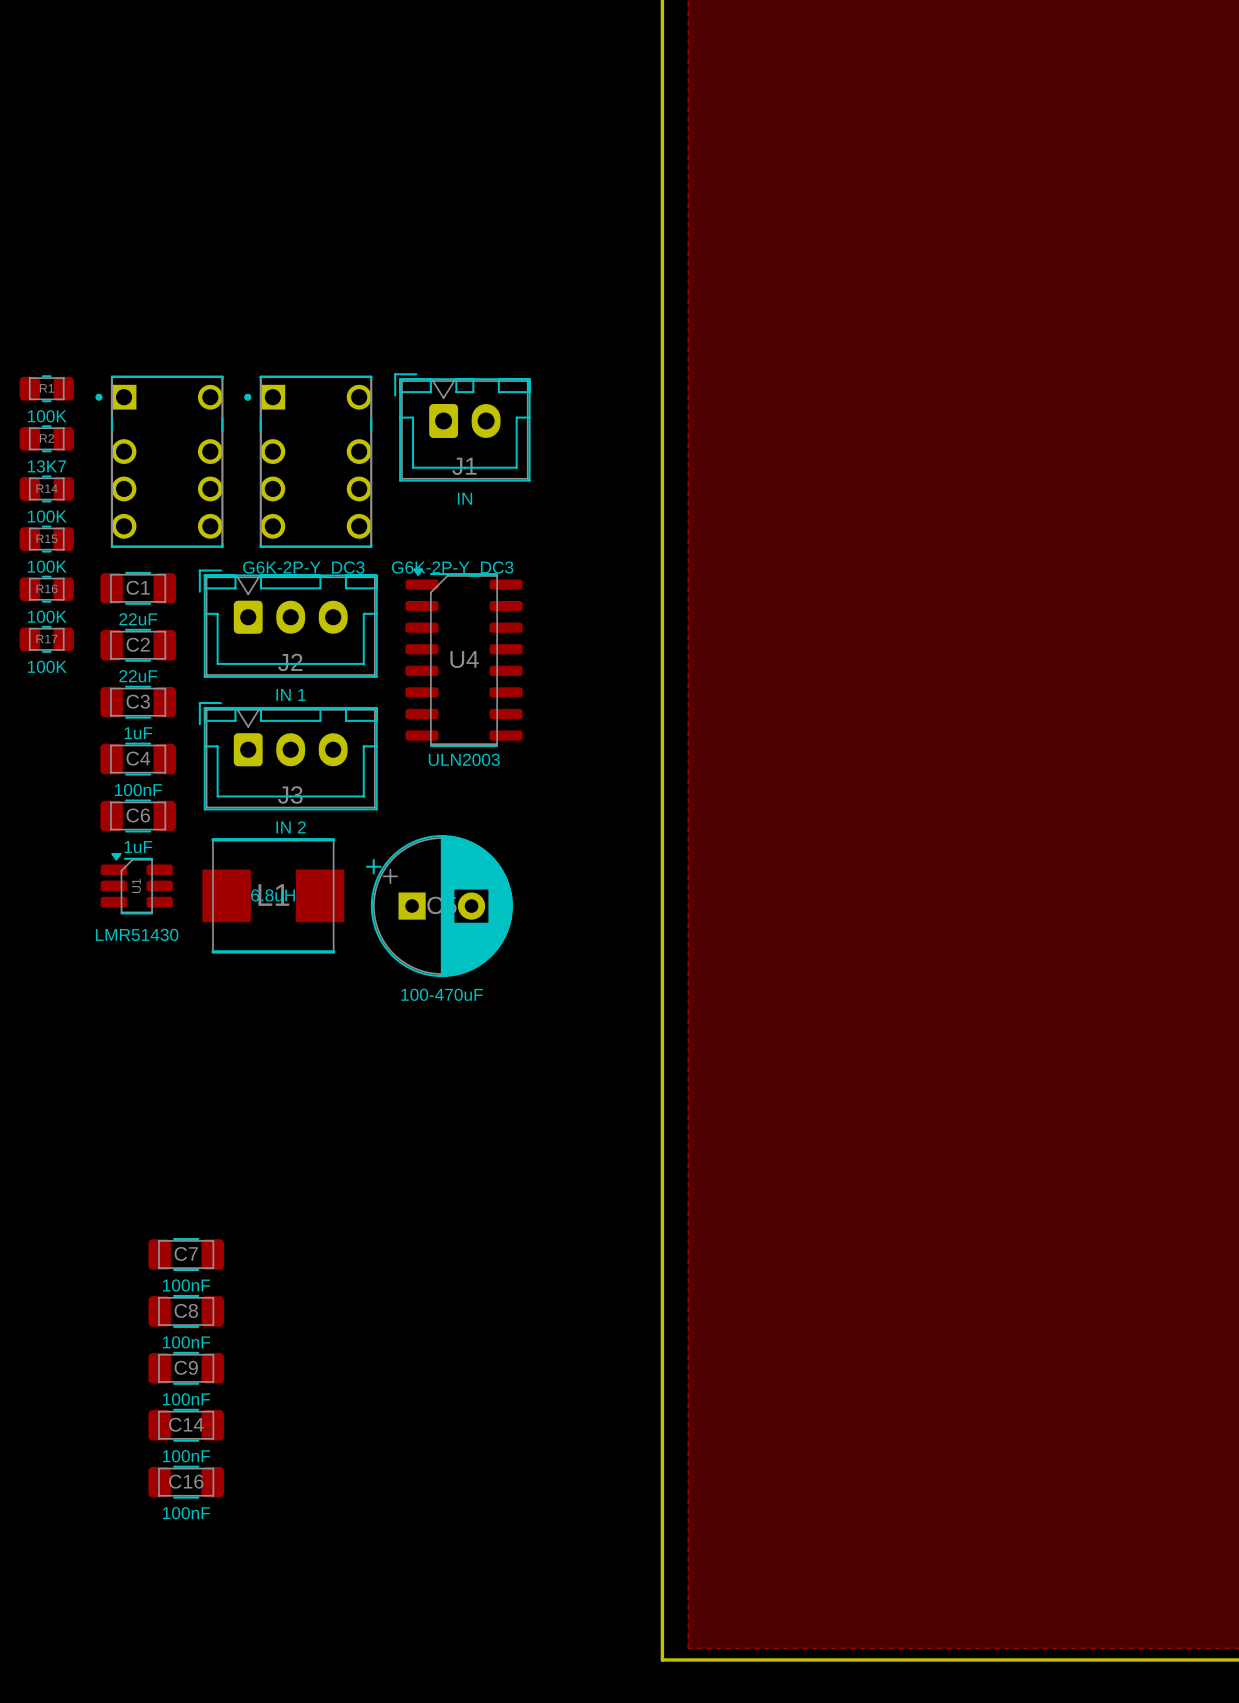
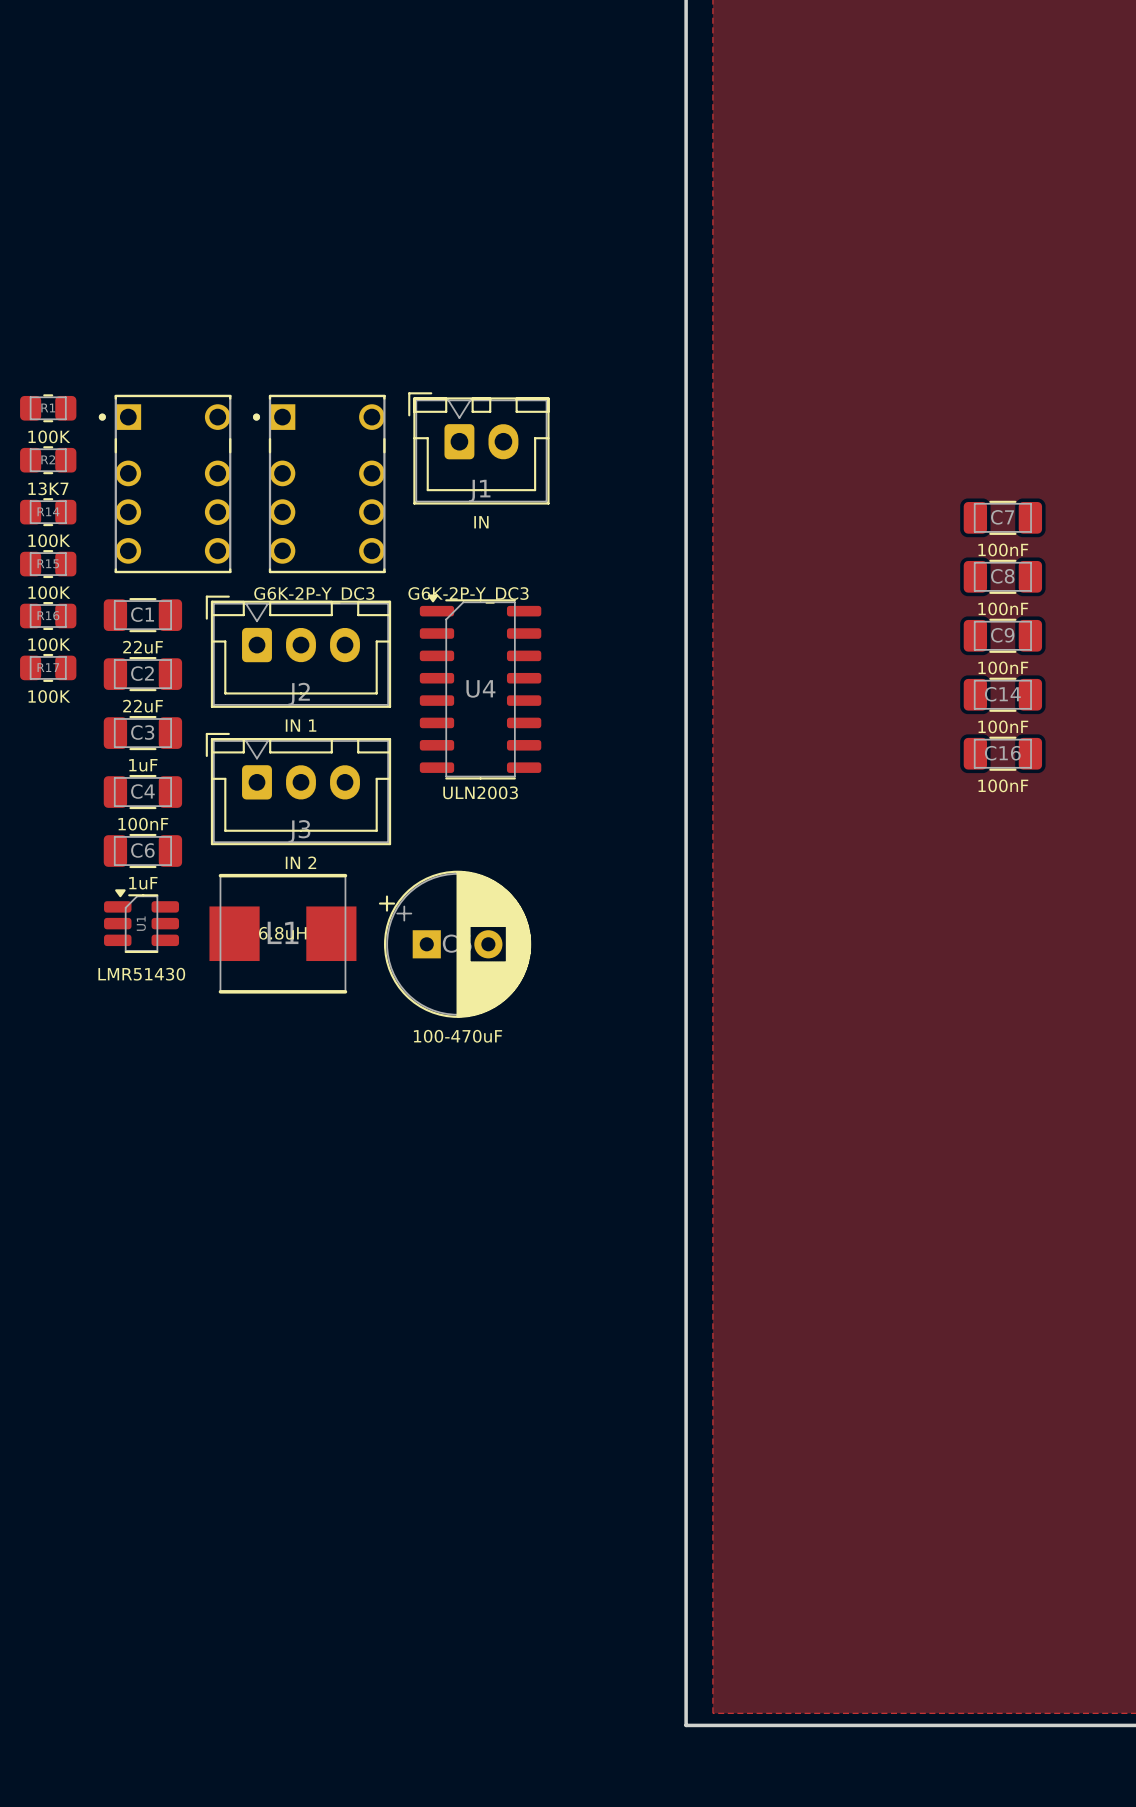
C7 position: (186, 1254) -> (1002, 517)
C8 position: (186, 1311) -> (1002, 576)
C9 position: (186, 1368) -> (1002, 635)
C14 position: (186, 1425) -> (1002, 694)
C16 position: (186, 1482) -> (1002, 753)

